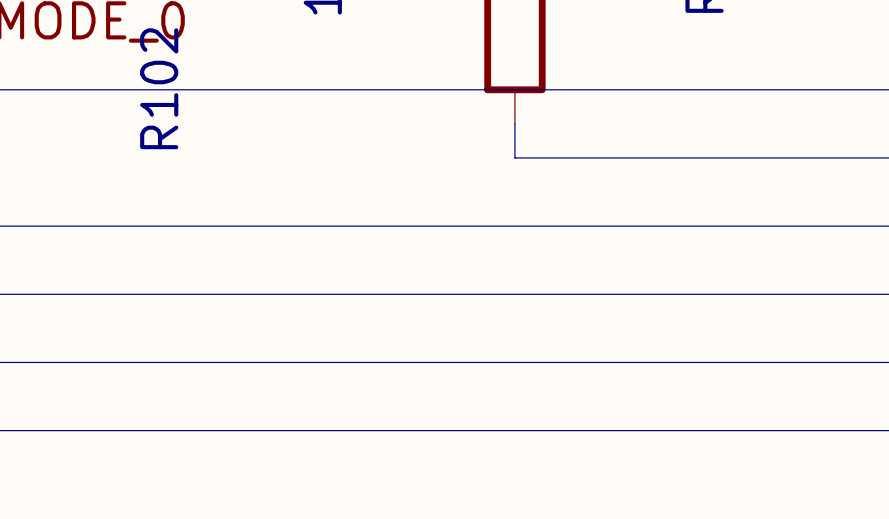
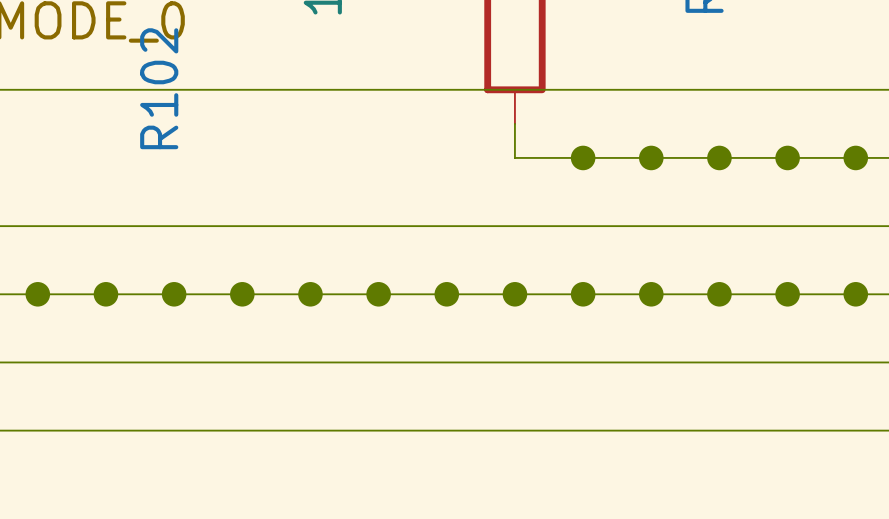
junction: none -> (583, 157)
junction: none -> (651, 157)
junction: none -> (719, 157)
junction: none -> (787, 157)
junction: none -> (855, 157)
junction: none -> (37, 294)
junction: none -> (105, 294)
junction: none -> (174, 294)
junction: none -> (242, 294)
junction: none -> (310, 294)
junction: none -> (378, 294)
junction: none -> (446, 294)
junction: none -> (514, 294)
junction: none -> (583, 294)
junction: none -> (651, 294)
junction: none -> (719, 294)
junction: none -> (787, 294)
junction: none -> (855, 294)

